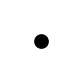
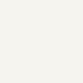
junction: (41, 41) -> none

